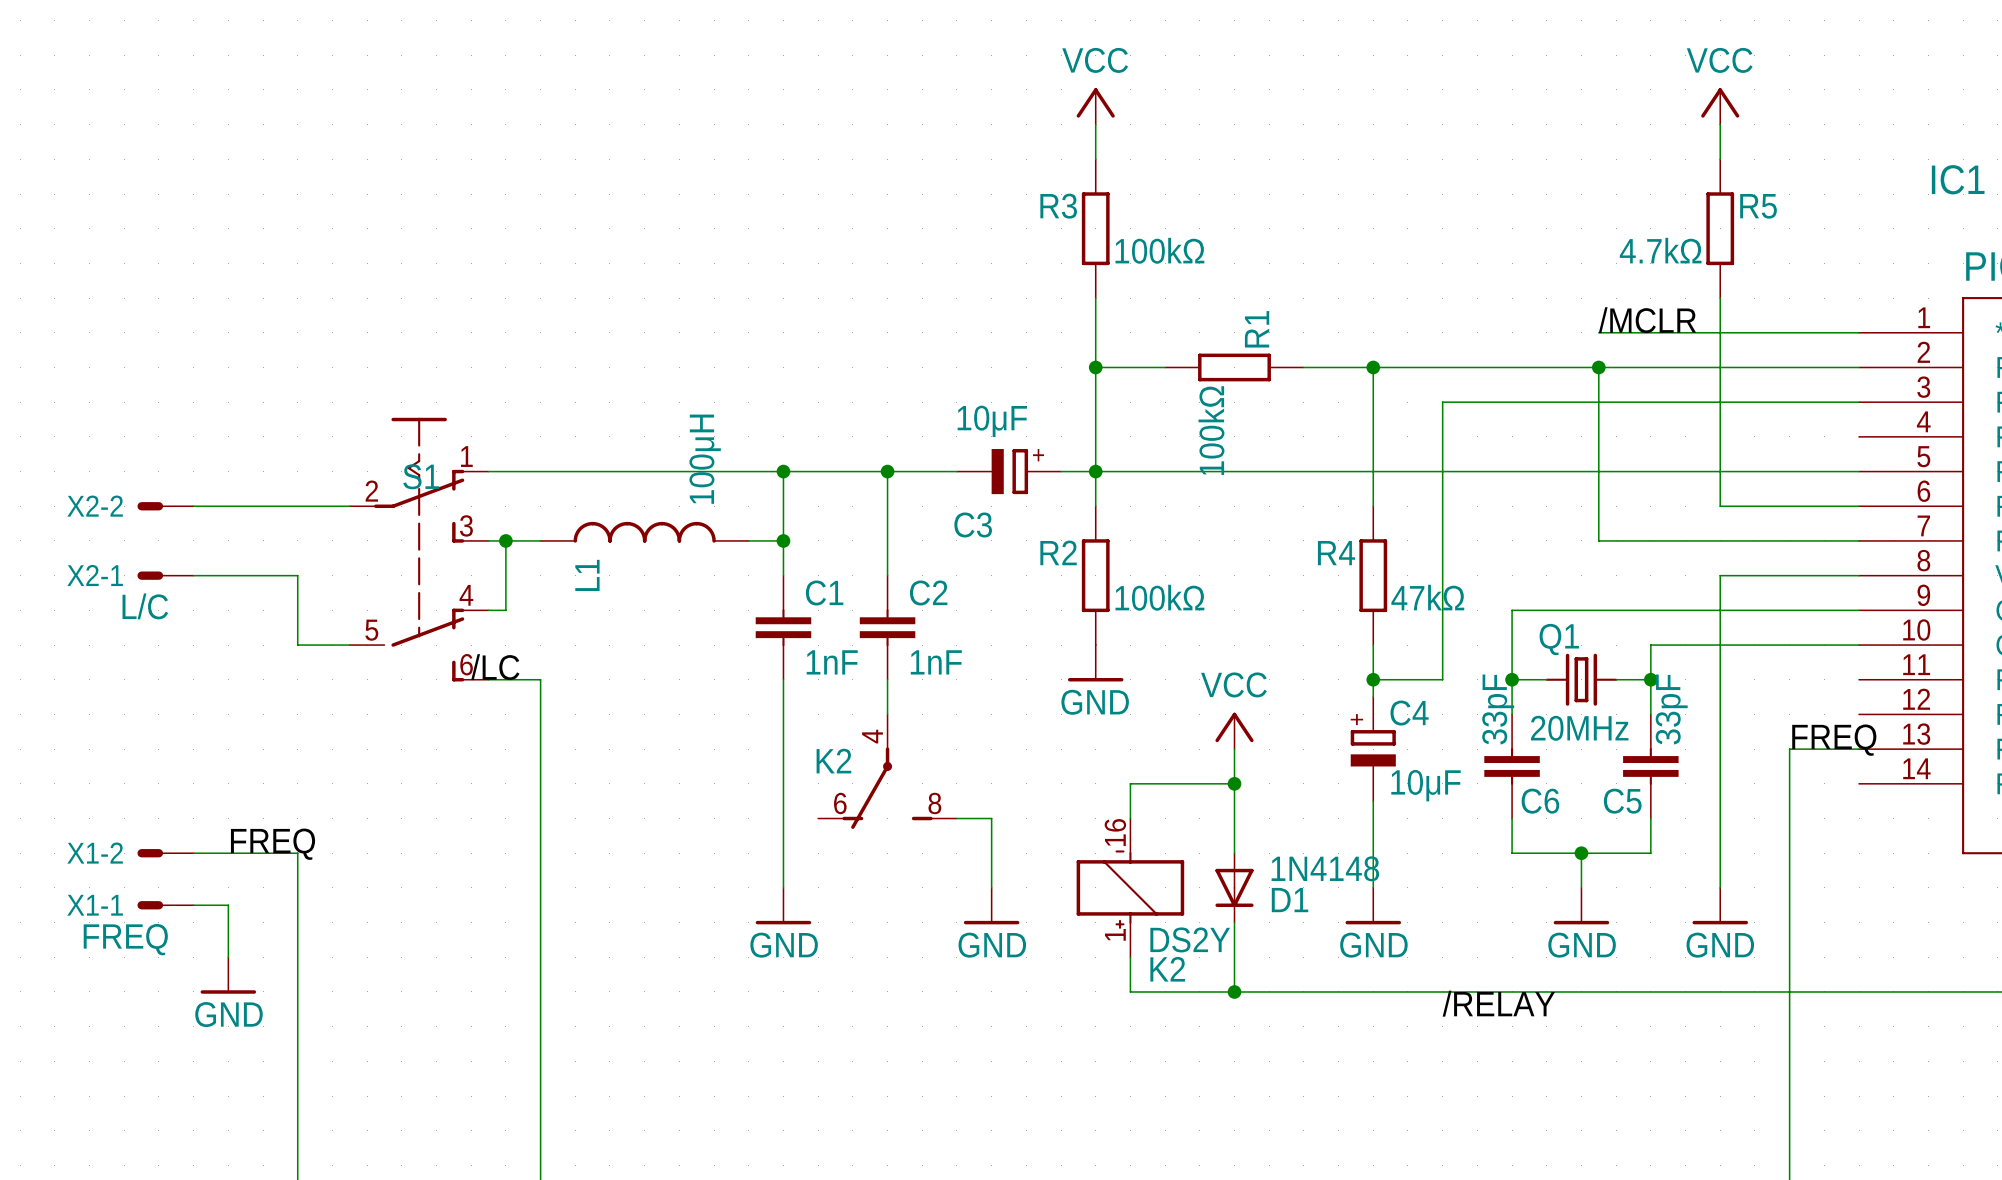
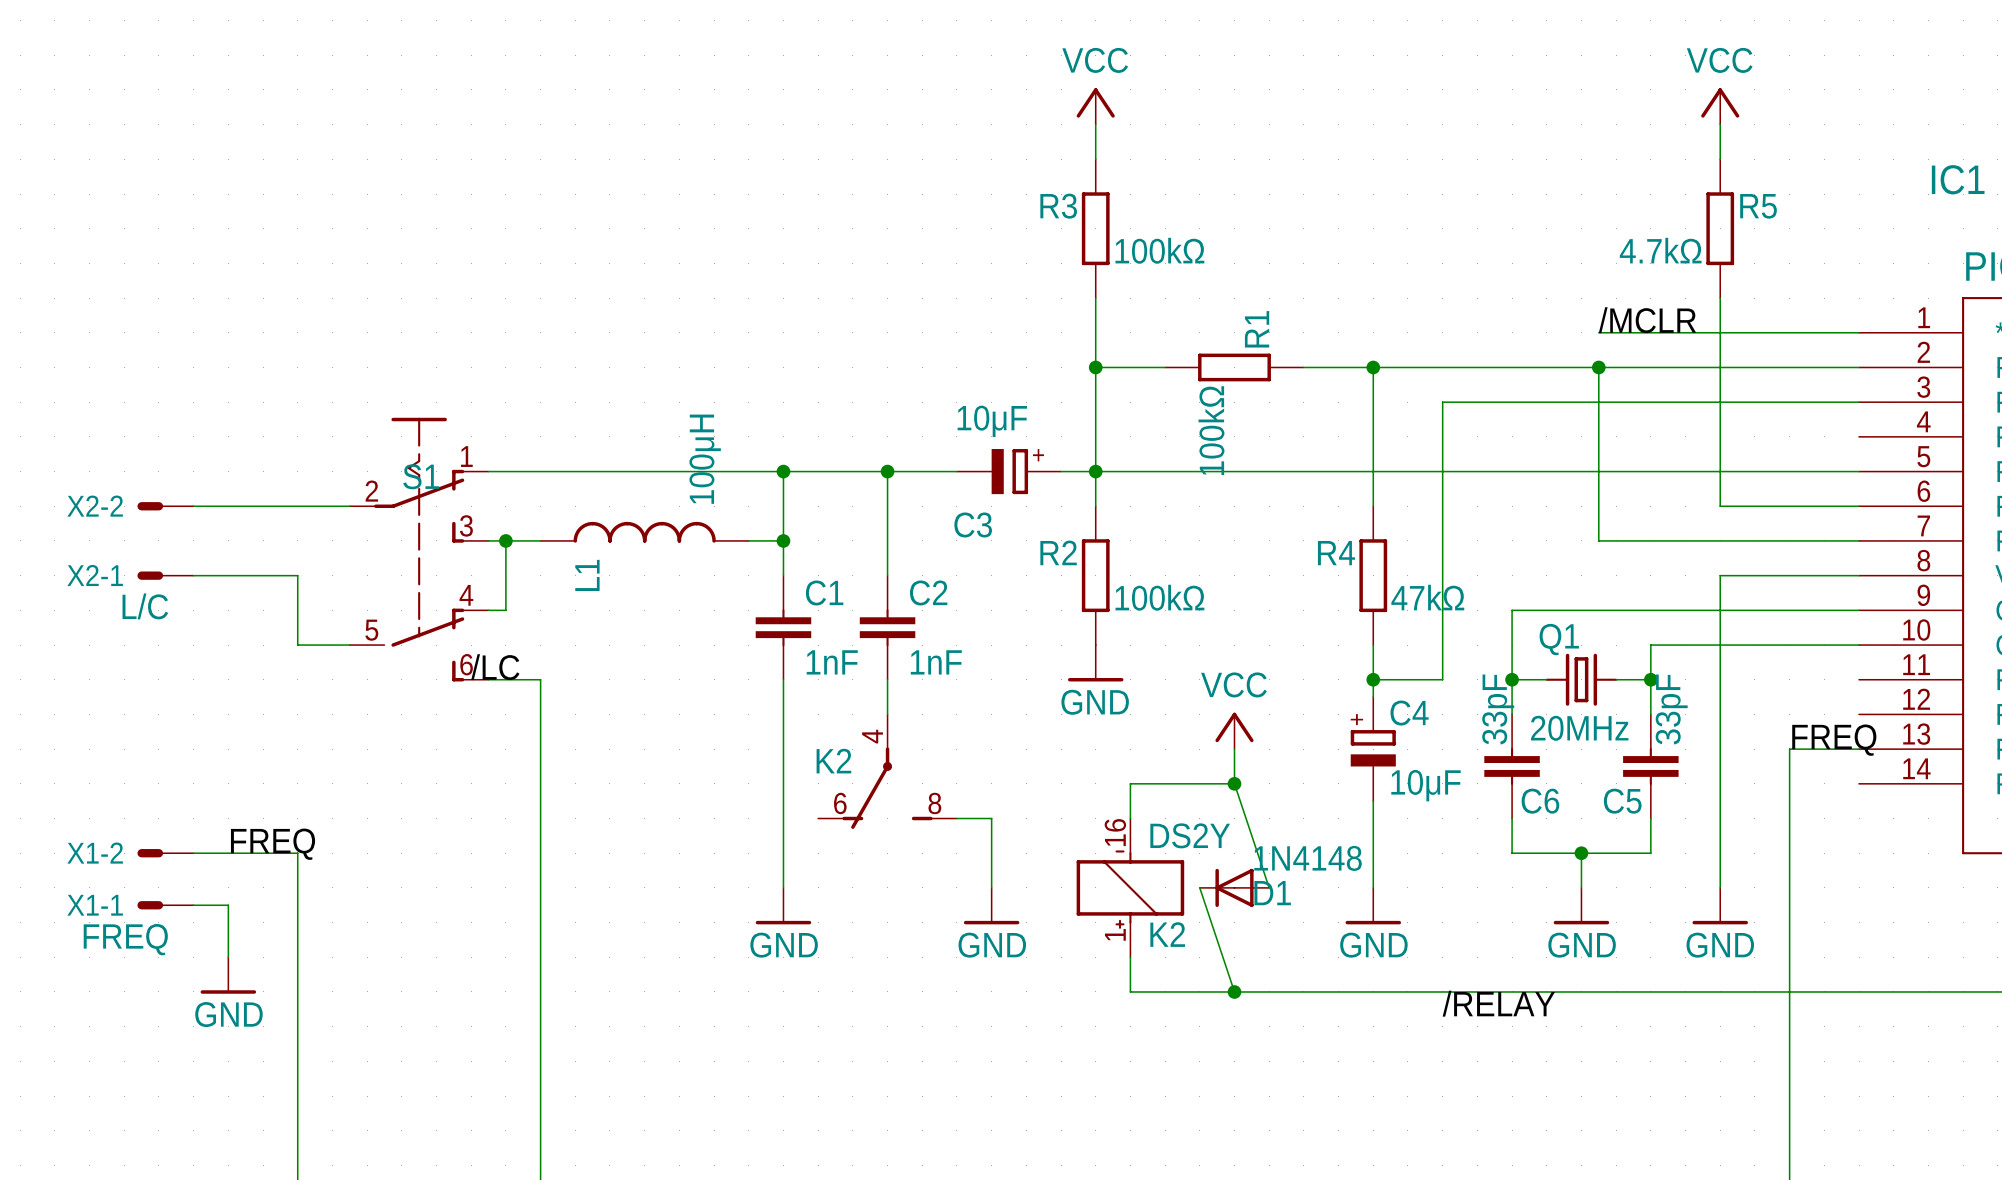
wire: (1234, 783) (1234, 853) -> (1234, 783) (1269, 887)
D1 rotation: 0° (1234, 887) -> 90° clockwise (1234, 887)
wire: (1234, 922) (1234, 991) -> (1199, 887) (1234, 991)
K2 value position: DS2Y (1190, 939) -> DS2Y (1190, 835)
K2 name position: K2 (1167, 969) -> K2 (1167, 934)

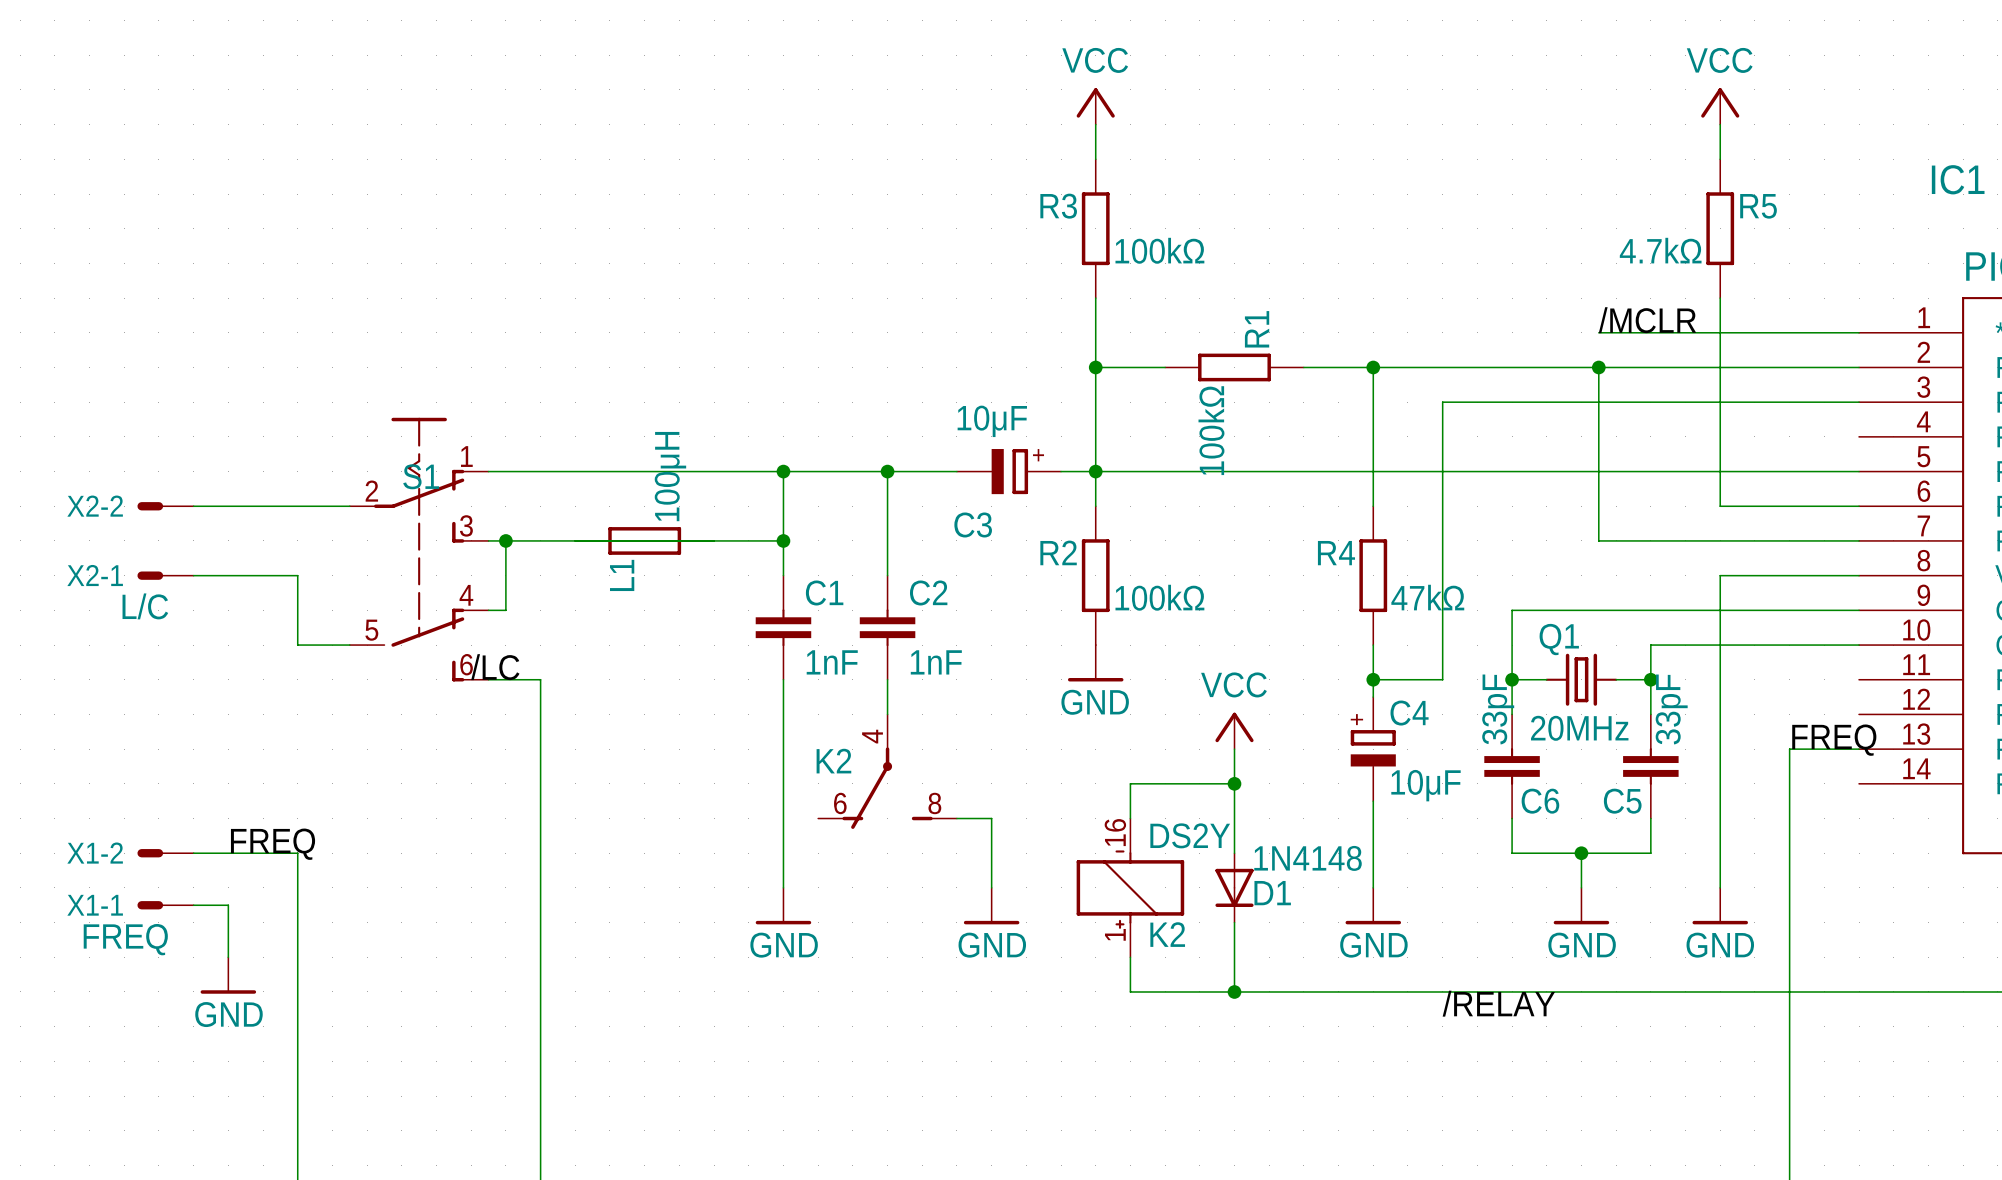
L1 value position: 100μH (705, 459) -> 100μH (670, 476)
L1 symbol: [540, 521, 749, 543] -> [575, 527, 715, 555]
wire: none -> (540, 540) (748, 540)
L1 name position: L1 (587, 575) -> L1 (622, 575)
wire: (1234, 783) (1269, 887) -> (1234, 783) (1234, 853)
wire: (1199, 887) (1234, 991) -> (1234, 922) (1234, 991)
D1 rotation: 0° (1234, 887) -> 90° counterclockwise (1234, 887)

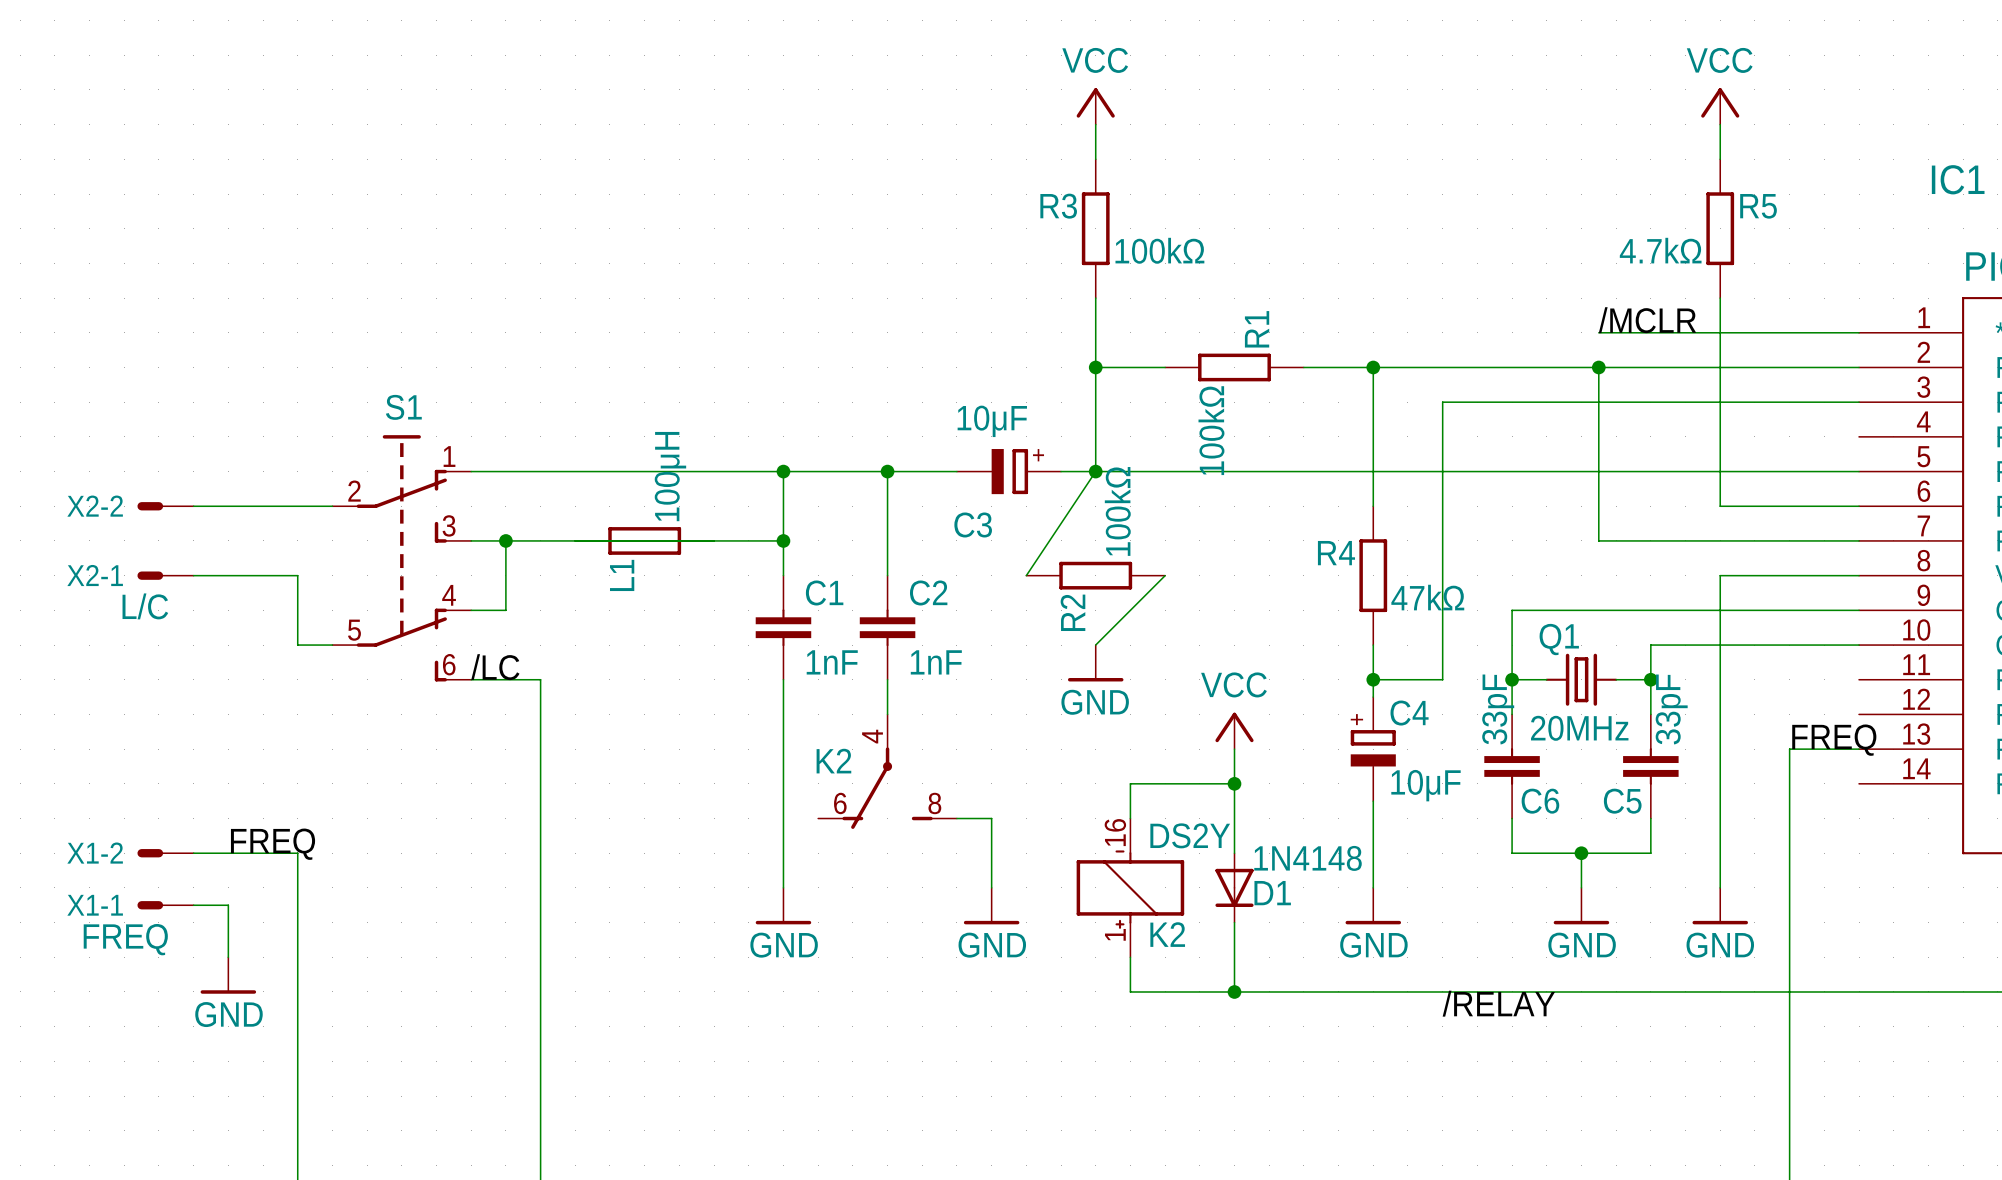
S1 symbol: [349, 417, 489, 682] -> [332, 435, 472, 682]
wire: (1095, 471) (1095, 506) -> (1095, 471) (1026, 575)
S1 name position: S1 (421, 476) -> S1 (403, 407)
R2 name position: R2 (1058, 552) -> R2 (1072, 612)
R2 rotation: 0° (1095, 575) -> 90° clockwise (1095, 575)
wire: none -> (1165, 575) (1095, 645)
R2 value position: 100kΩ (1159, 597) -> 100kΩ (1117, 511)

